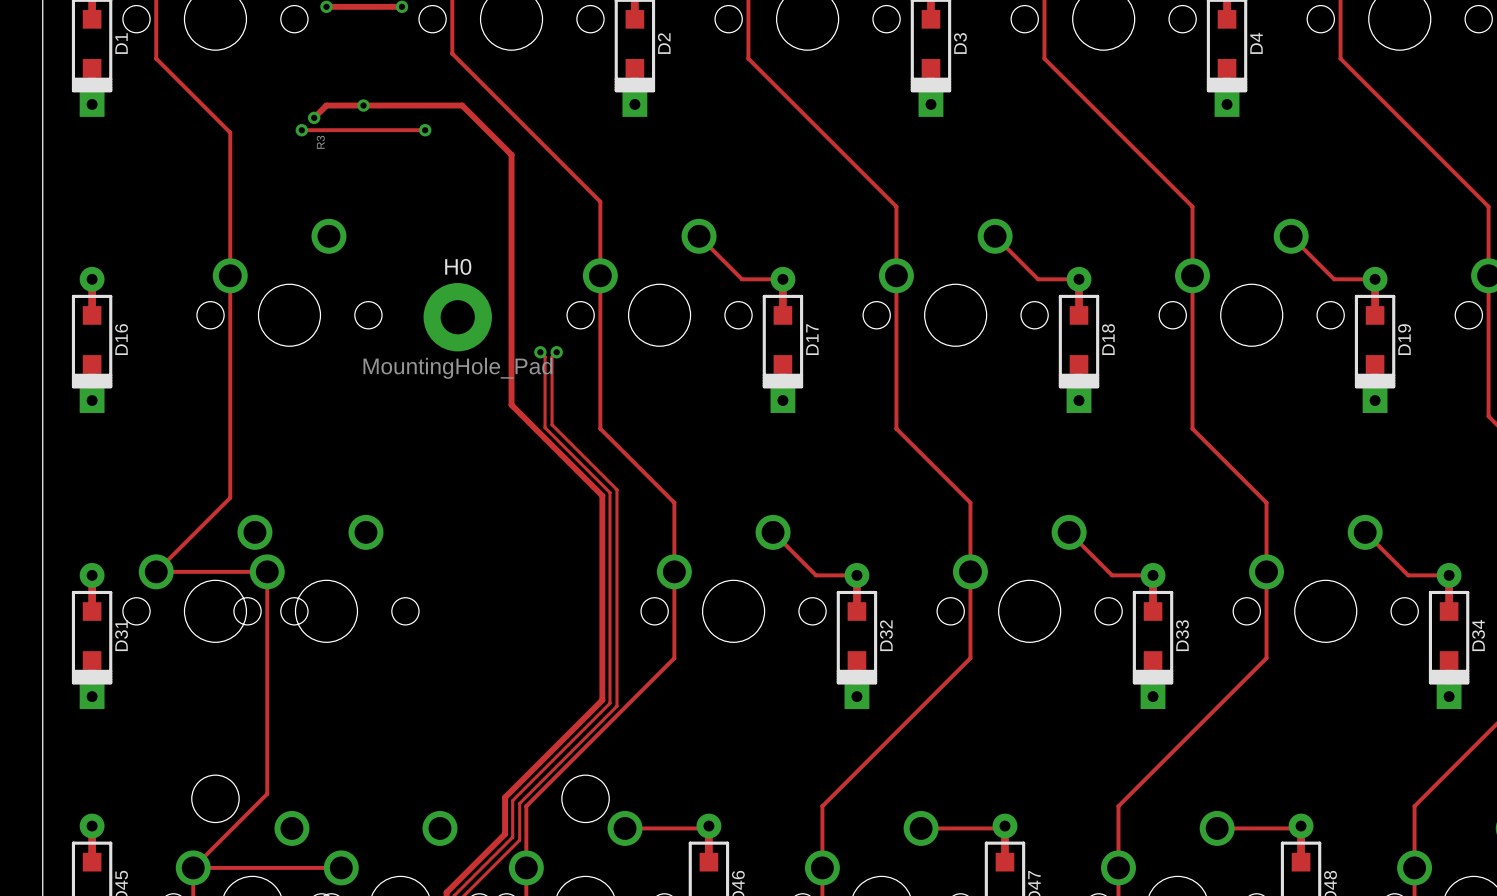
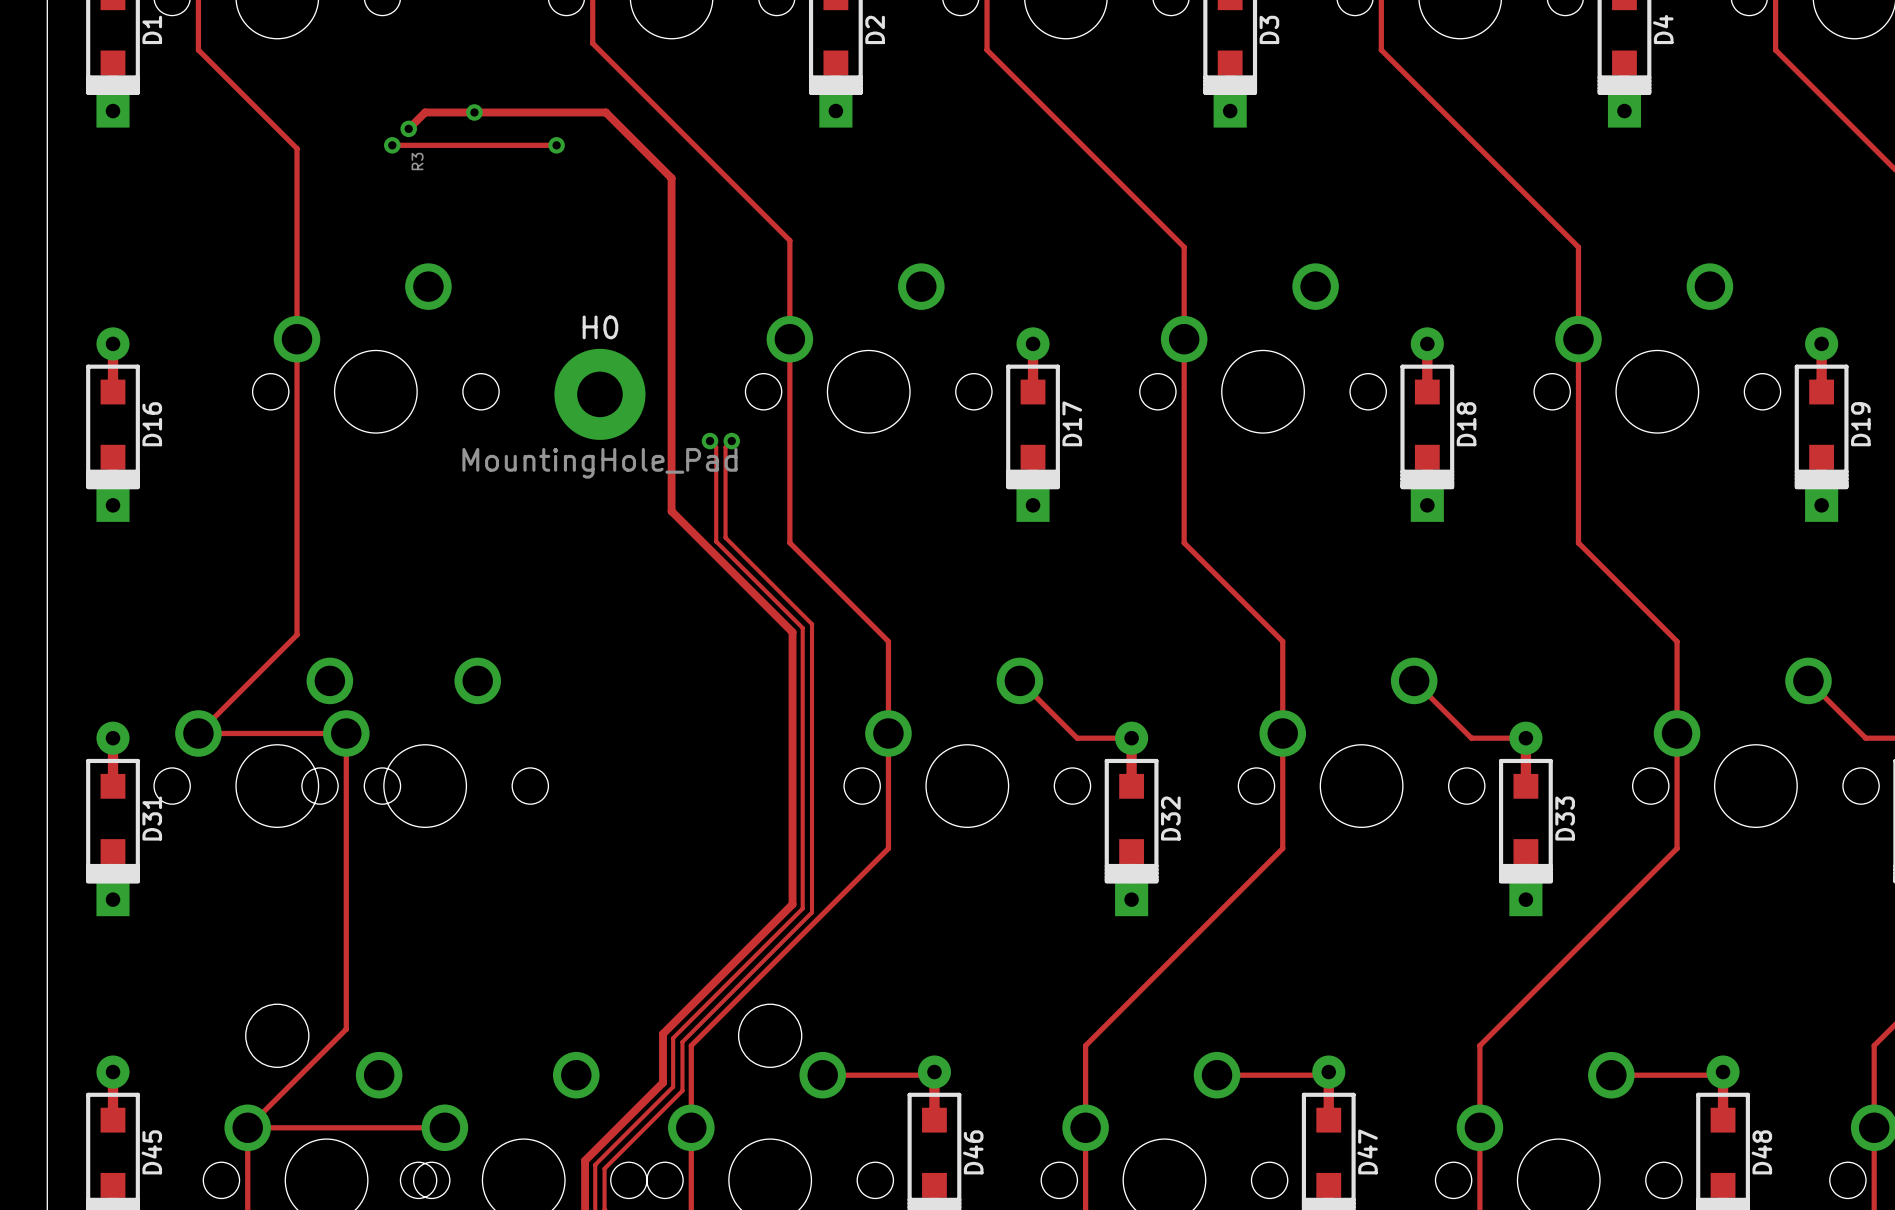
track: (699, 236) (742, 279) (782, 279) -> none
track: (995, 236) (1038, 279) (1079, 279) -> none
track: (1291, 236) (1334, 279) (1375, 279) -> none

